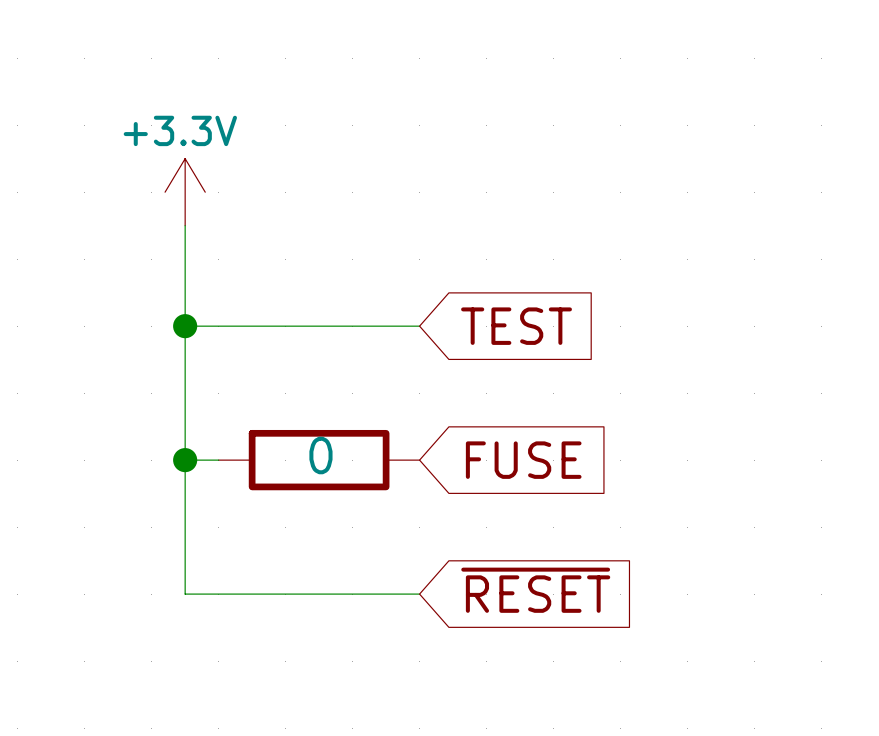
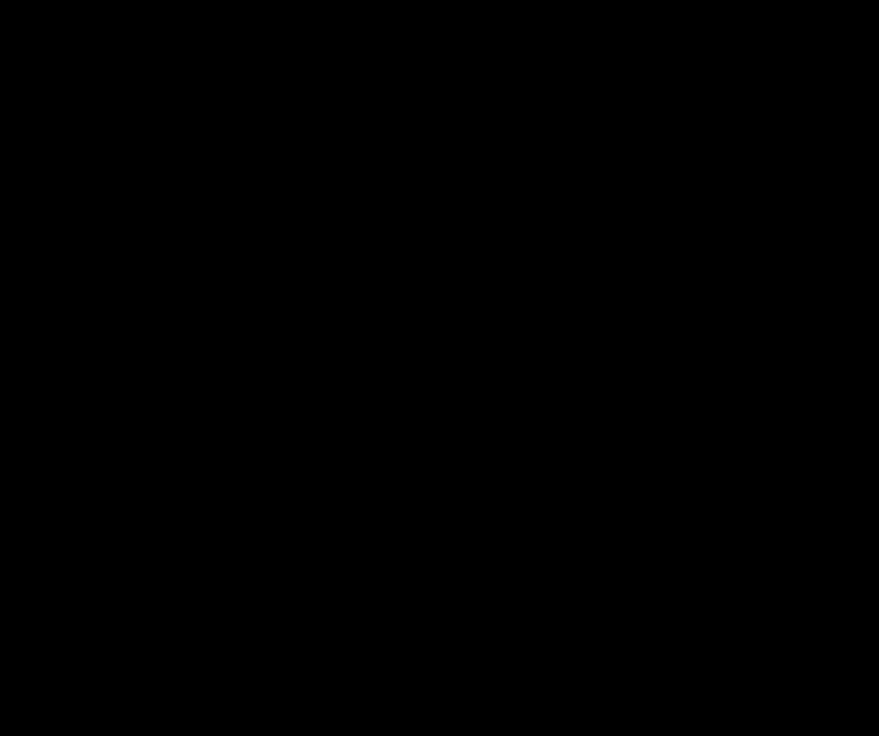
power symbol: +3.3V (185, 192) -> none
wire: (185, 225) (185, 594) (419, 594) -> none
wire: (185, 326) (419, 326) -> none
junction: (185, 326) -> none
global label: TEST (516, 326) -> none
wire: (185, 460) (218, 460) -> none
junction: (185, 460) -> none
part: 0 (319, 460) -> none
global label: FUSE (523, 460) -> none
global label: ~{RESET} (535, 590) -> none

